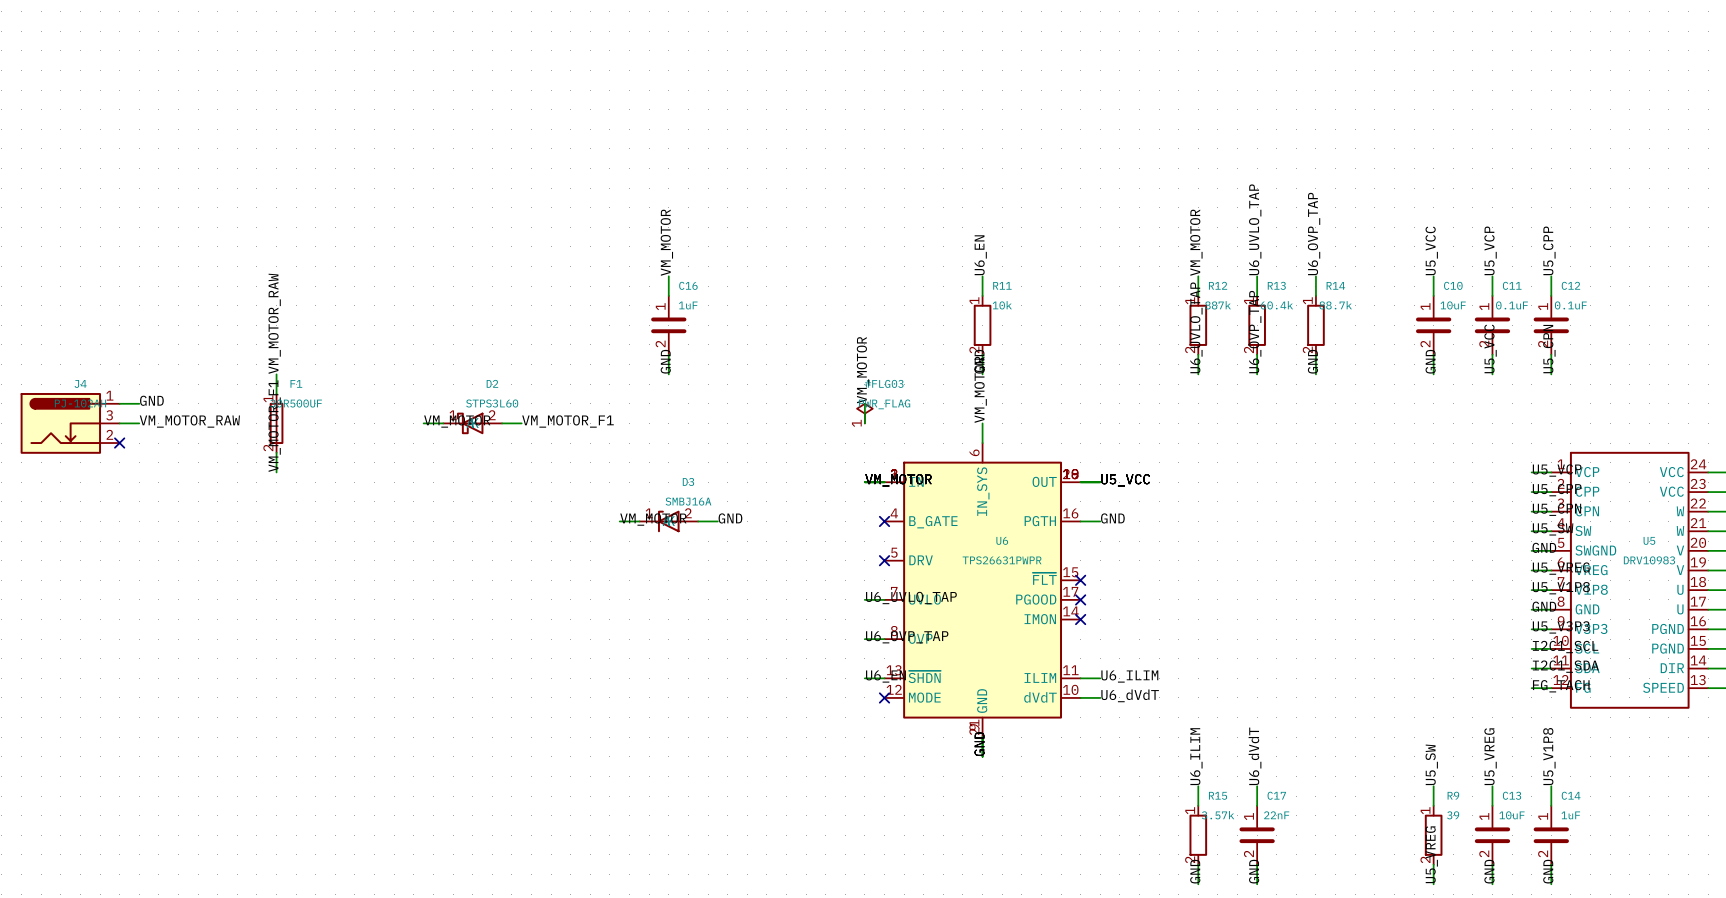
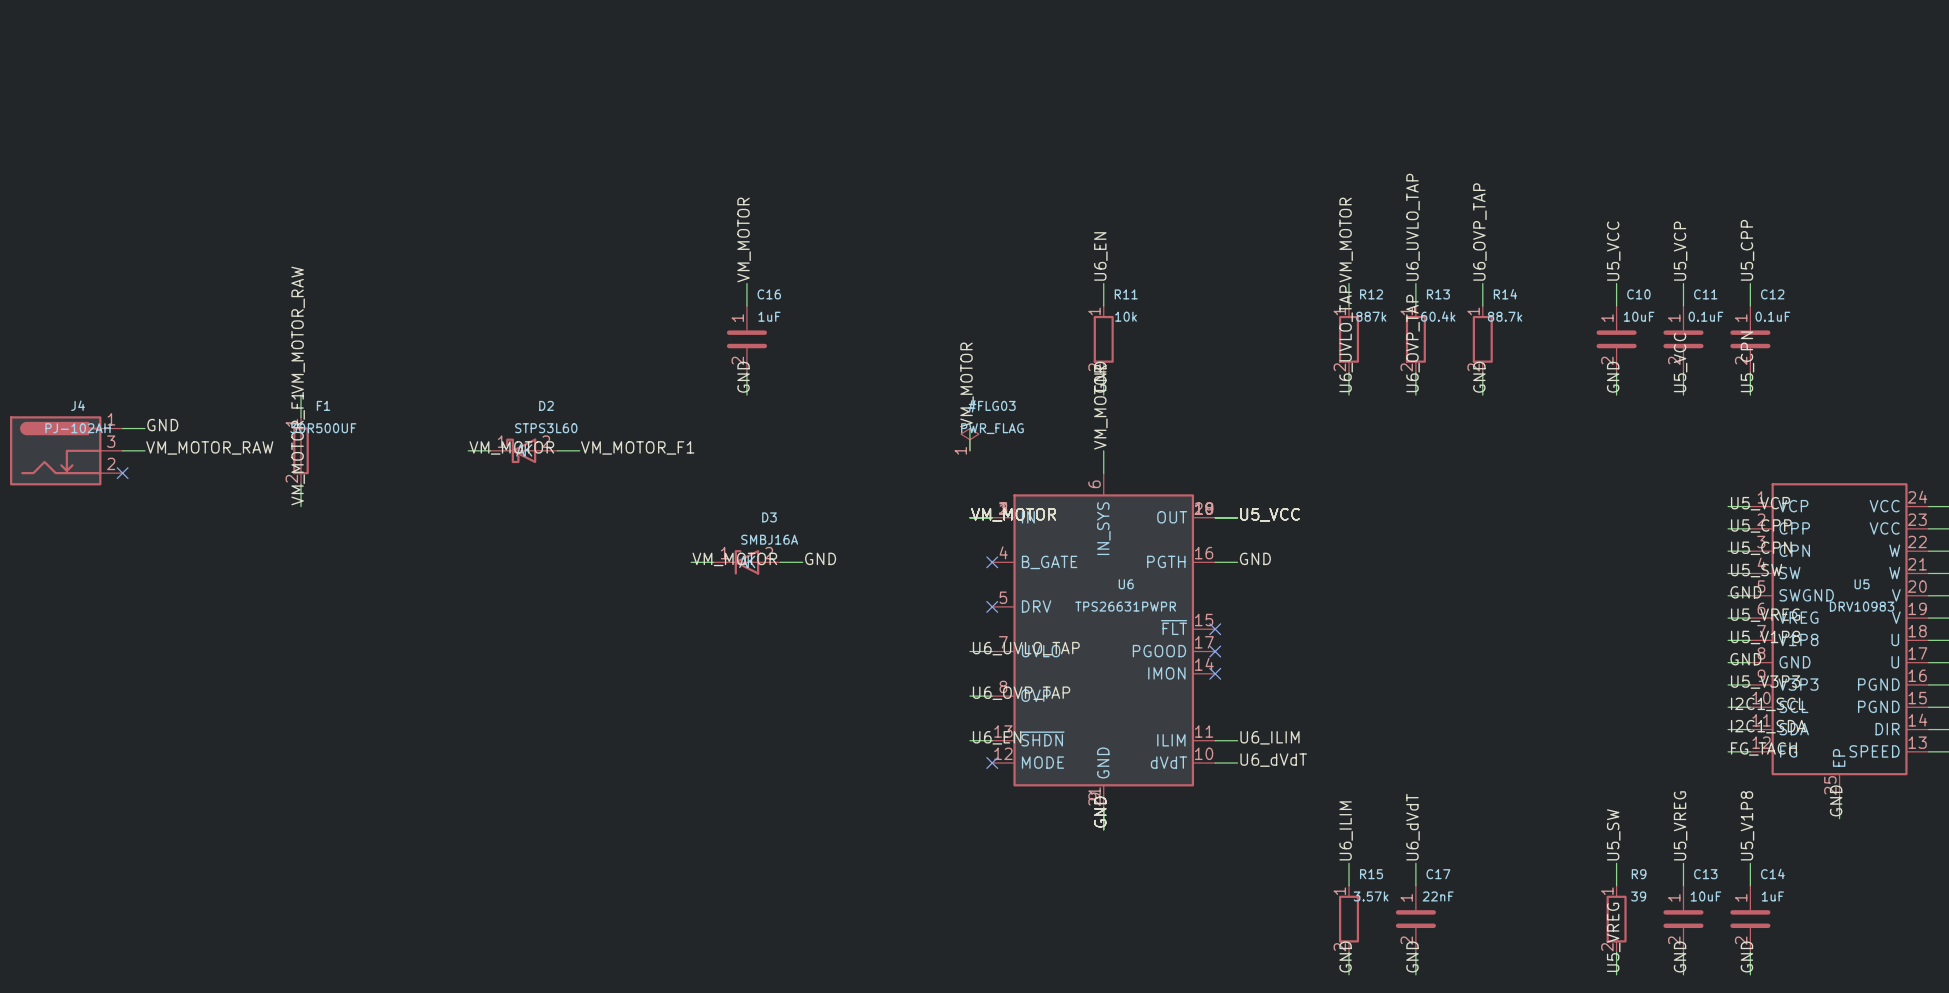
U5 symbol: [1551, 451, 1709, 709] -> [1750, 483, 1929, 797]
wire: none -> (1839, 796) (1839, 818)
label: none -> GND (1836, 800)

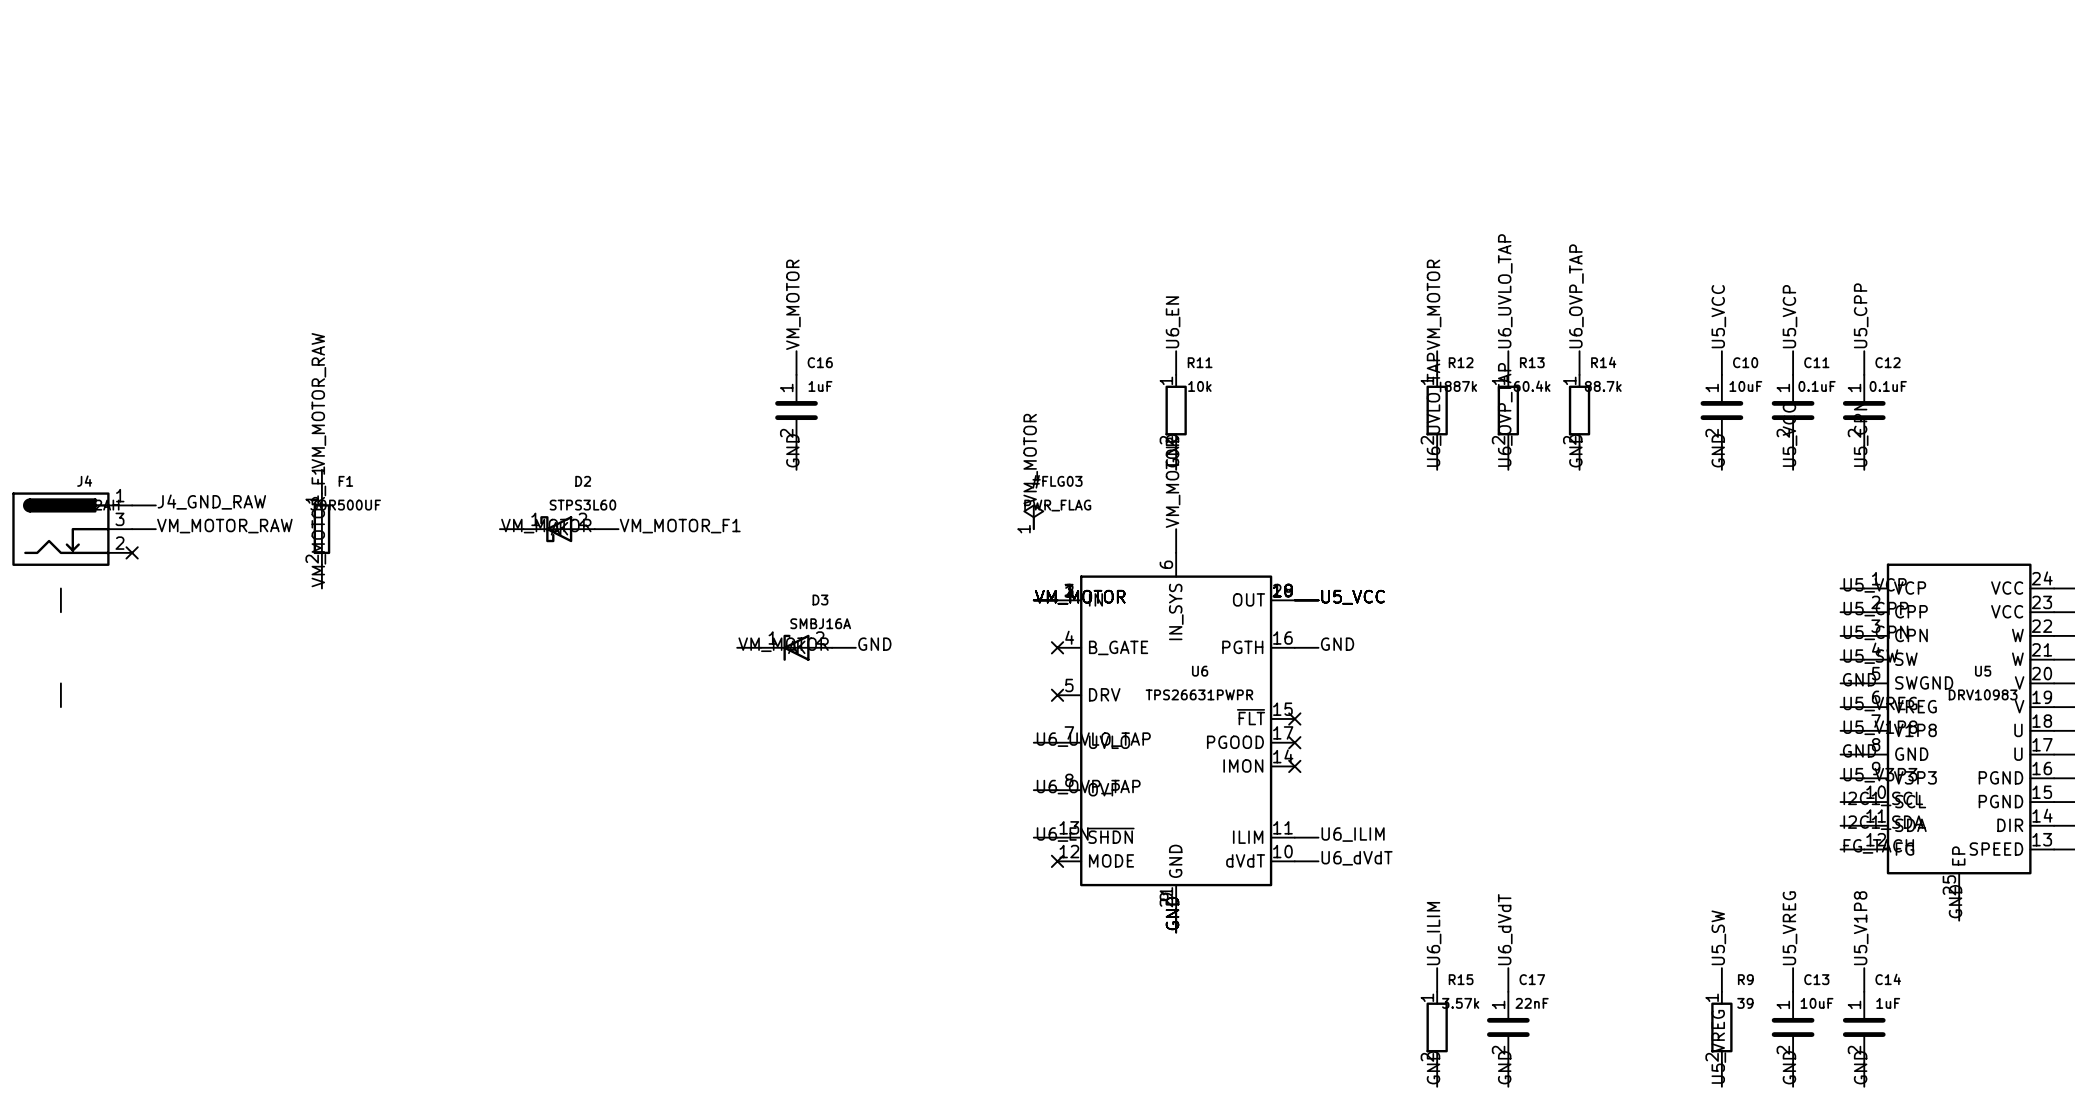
label: GND (162, 425) -> J4_GND_RAW (211, 502)
wire: none -> (60, 588) (60, 612)
wire: none -> (60, 683) (60, 707)

